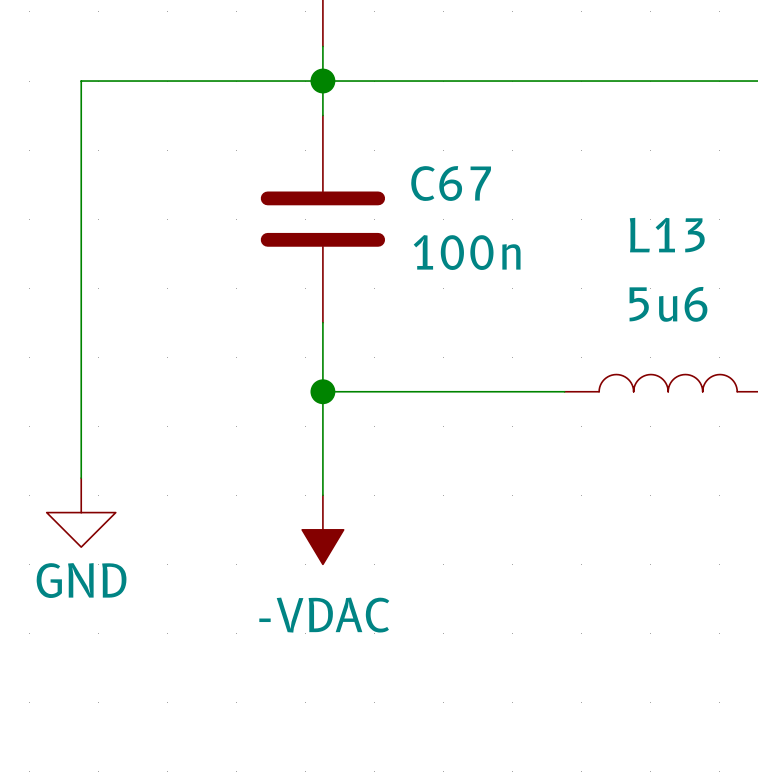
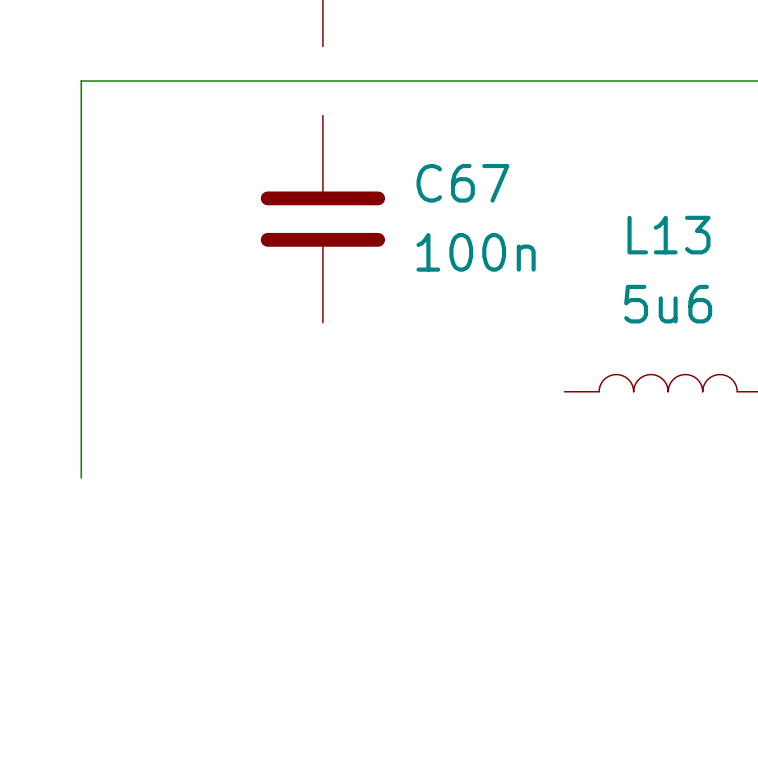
wire: (322, 46) (322, 115) -> none
junction: (322, 81) -> none
wire: (322, 322) (322, 495) -> none
wire: (322, 391) (564, 391) -> none
junction: (322, 391) -> none
power symbol: GND (81, 512) -> none
power symbol: -VDAC (322, 529) -> none

